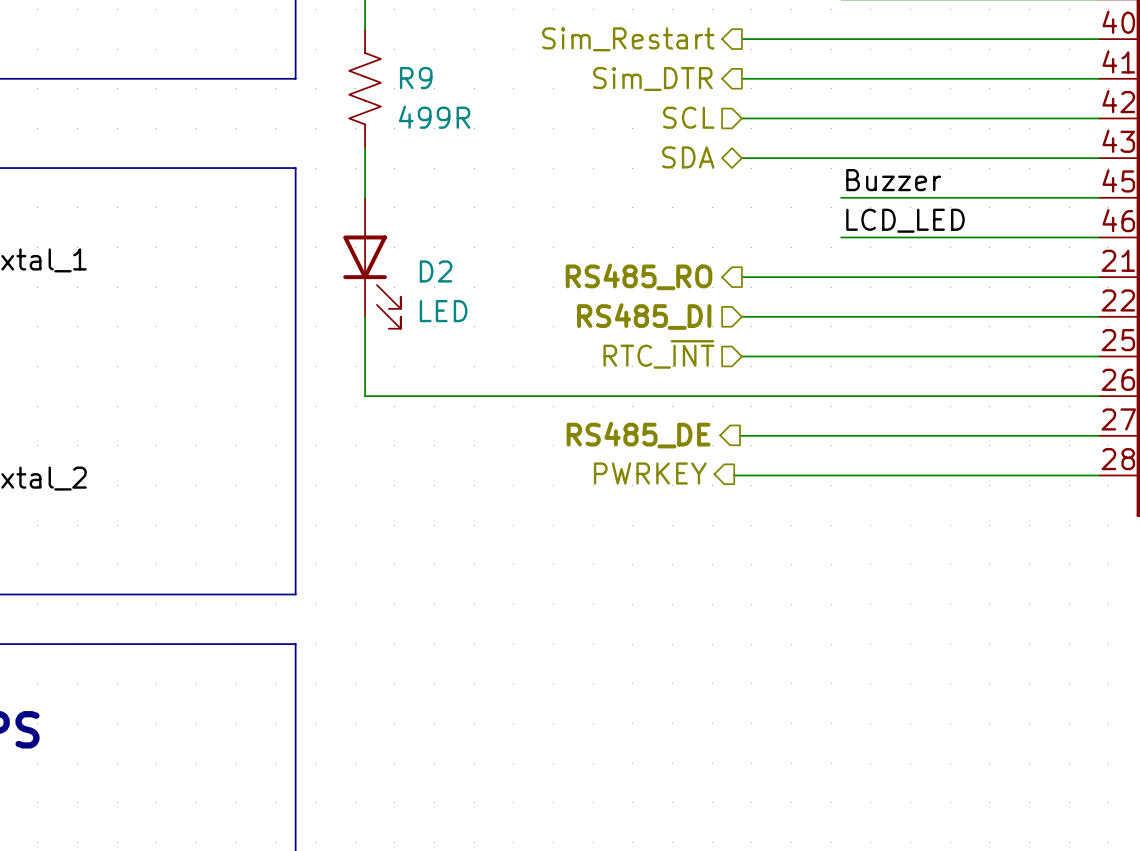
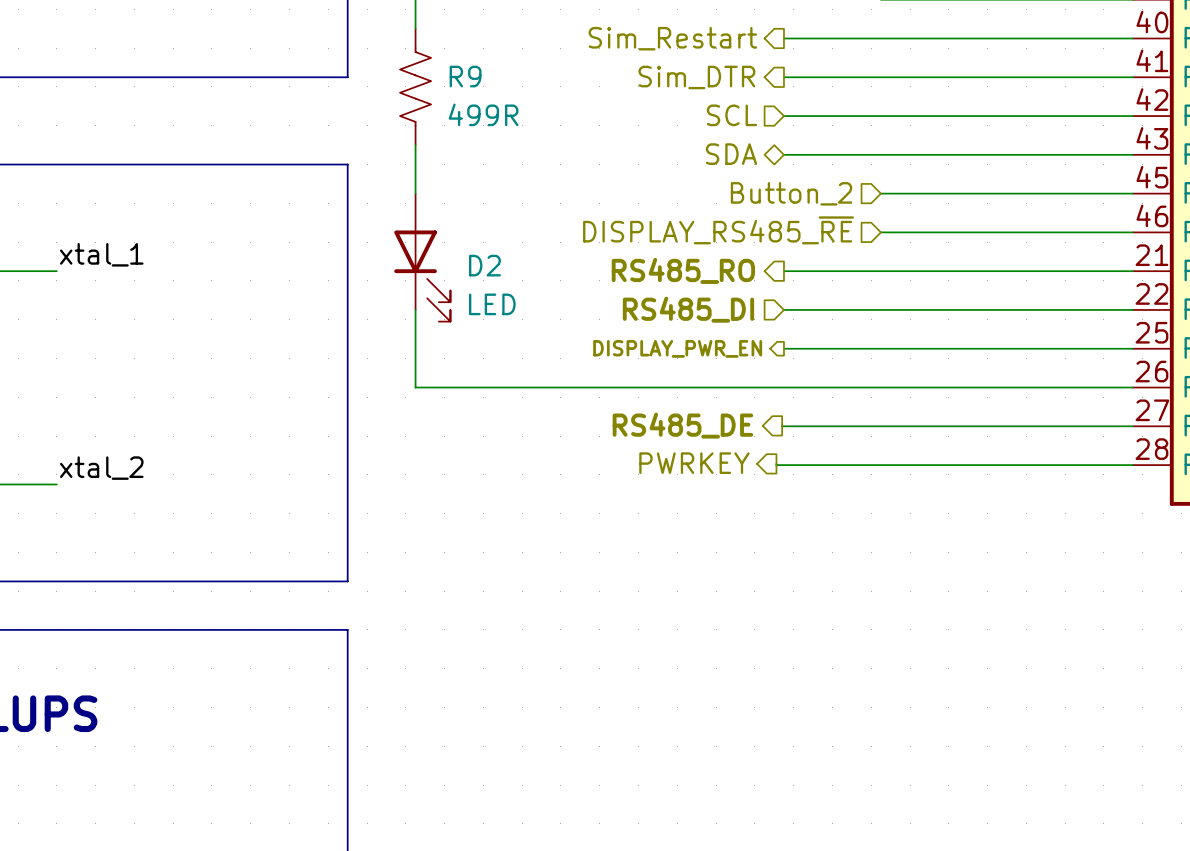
label: Buzzer (893, 180) -> none
hierarchical label: none -> Button_2 (791, 193)
label: LCD_LED (905, 220) -> none
hierarchical label: none -> DISPLAY_RS485_~{RE} (718, 230)
hierarchical label shape: input (658, 354) -> output (677, 348)
hierarchical label: RTC_~{INT} (658, 354) -> DISPLAY_PWR_EN (677, 348)

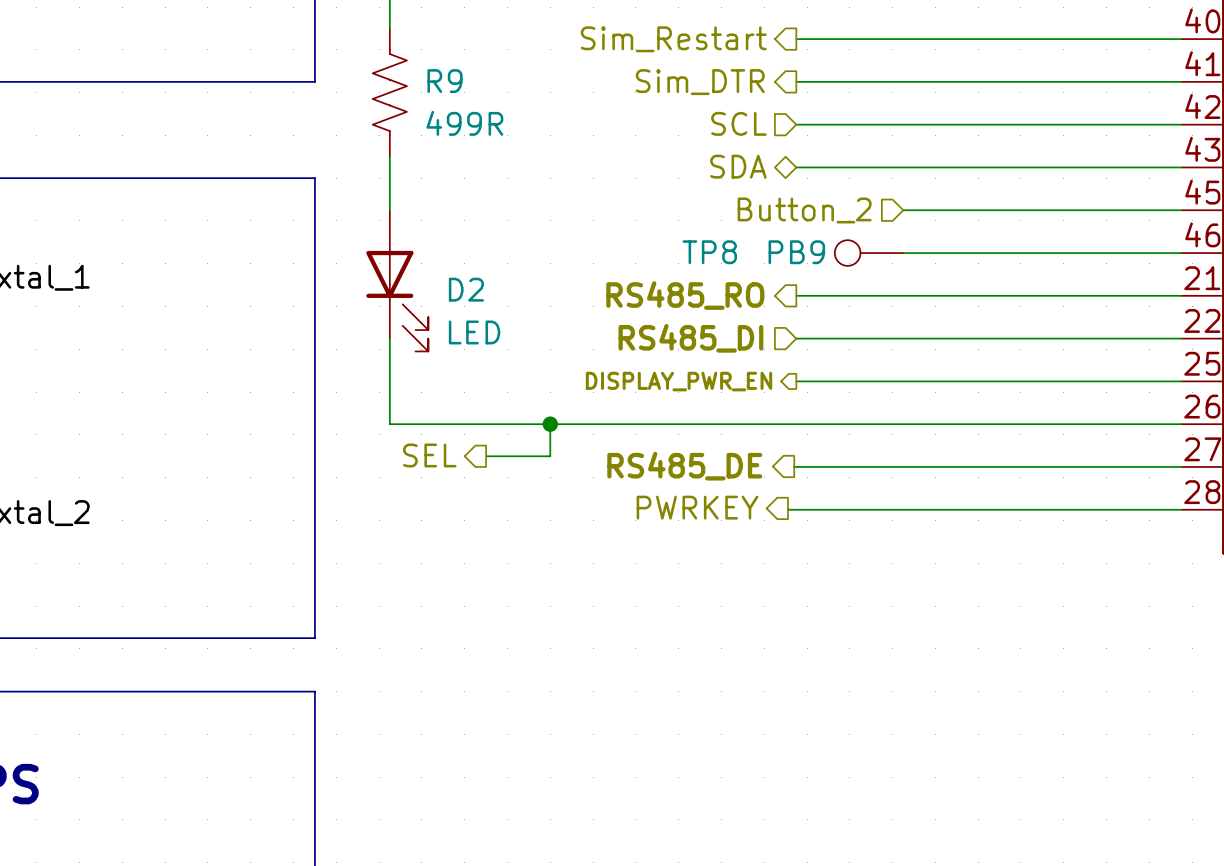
hierarchical label: DISPLAY_RS485_~{RE} (718, 230) -> none
TP8: none -> PB9 (869, 253)
wire: none -> (550, 424) (550, 456) (486, 456)
junction: none -> (550, 424)
hierarchical label: none -> SEL (429, 455)

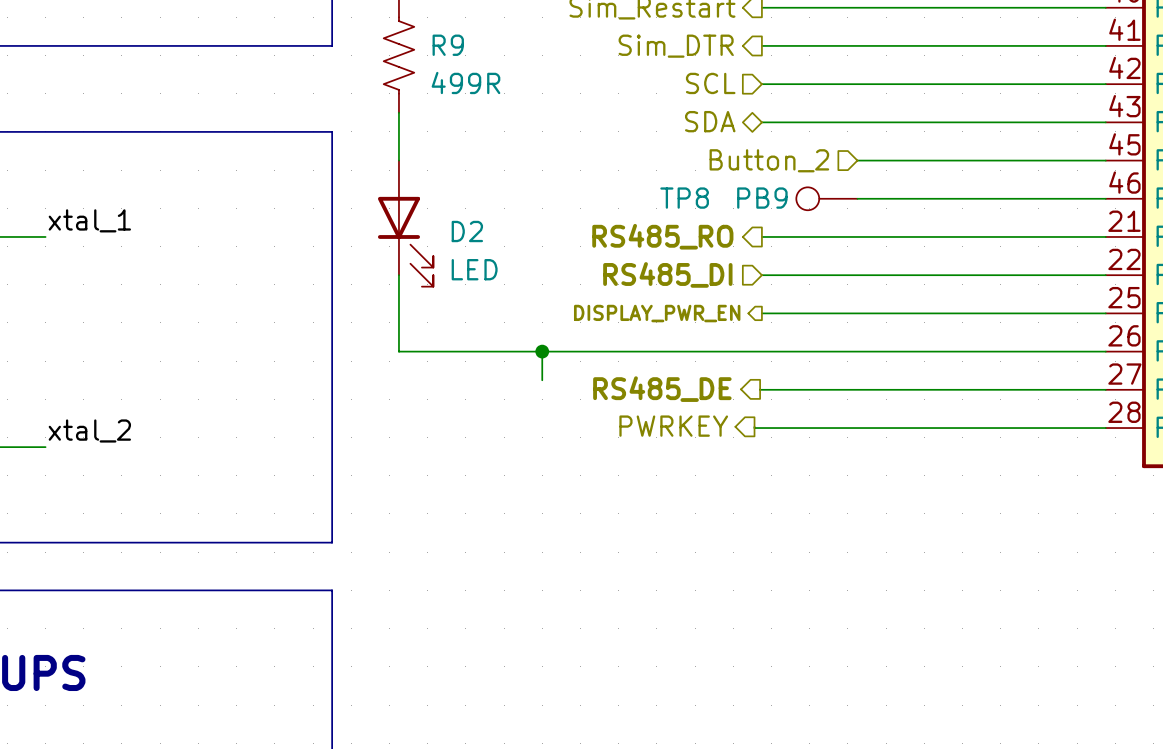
hierarchical label: SEL (429, 455) -> none
wire: (486, 456) (550, 456) -> none

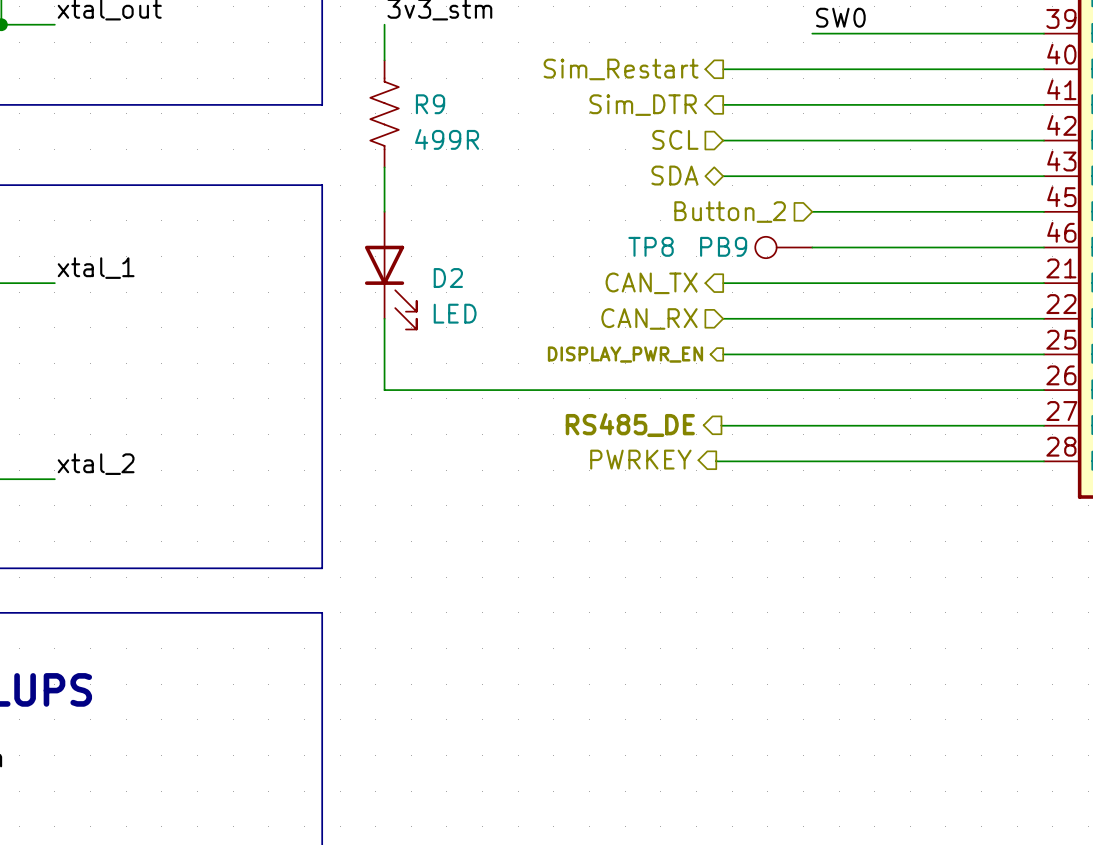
hierarchical label: RS485_RO (662, 236) -> CAN_TX (651, 283)
hierarchical label: RS485_DI (667, 274) -> CAN_RX (649, 318)
wire: (542, 351) (542, 380) -> none
junction: (542, 351) -> none

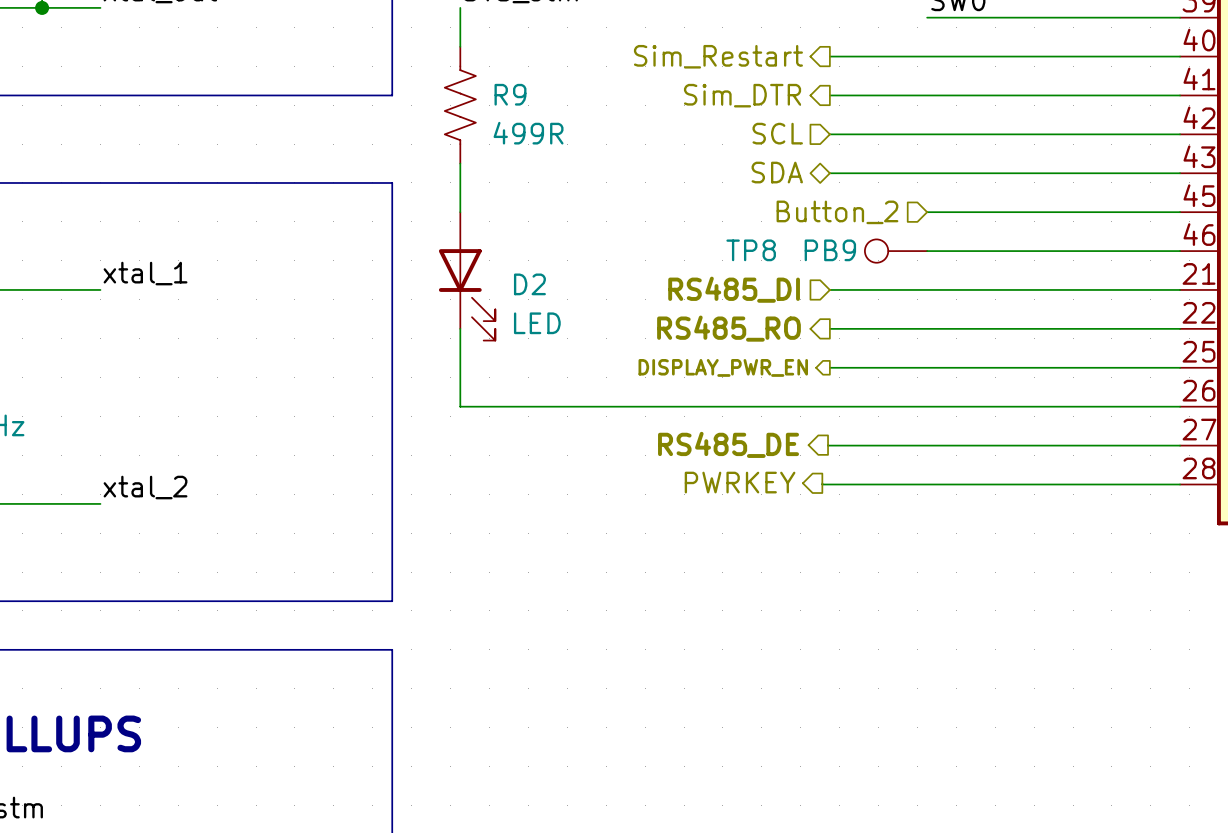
hierarchical label shape: output (651, 283) -> input (734, 289)
hierarchical label: CAN_TX (651, 283) -> RS485_DI (734, 289)
hierarchical label shape: input (649, 318) -> output (728, 328)
hierarchical label: CAN_RX (649, 318) -> RS485_RO (728, 328)

